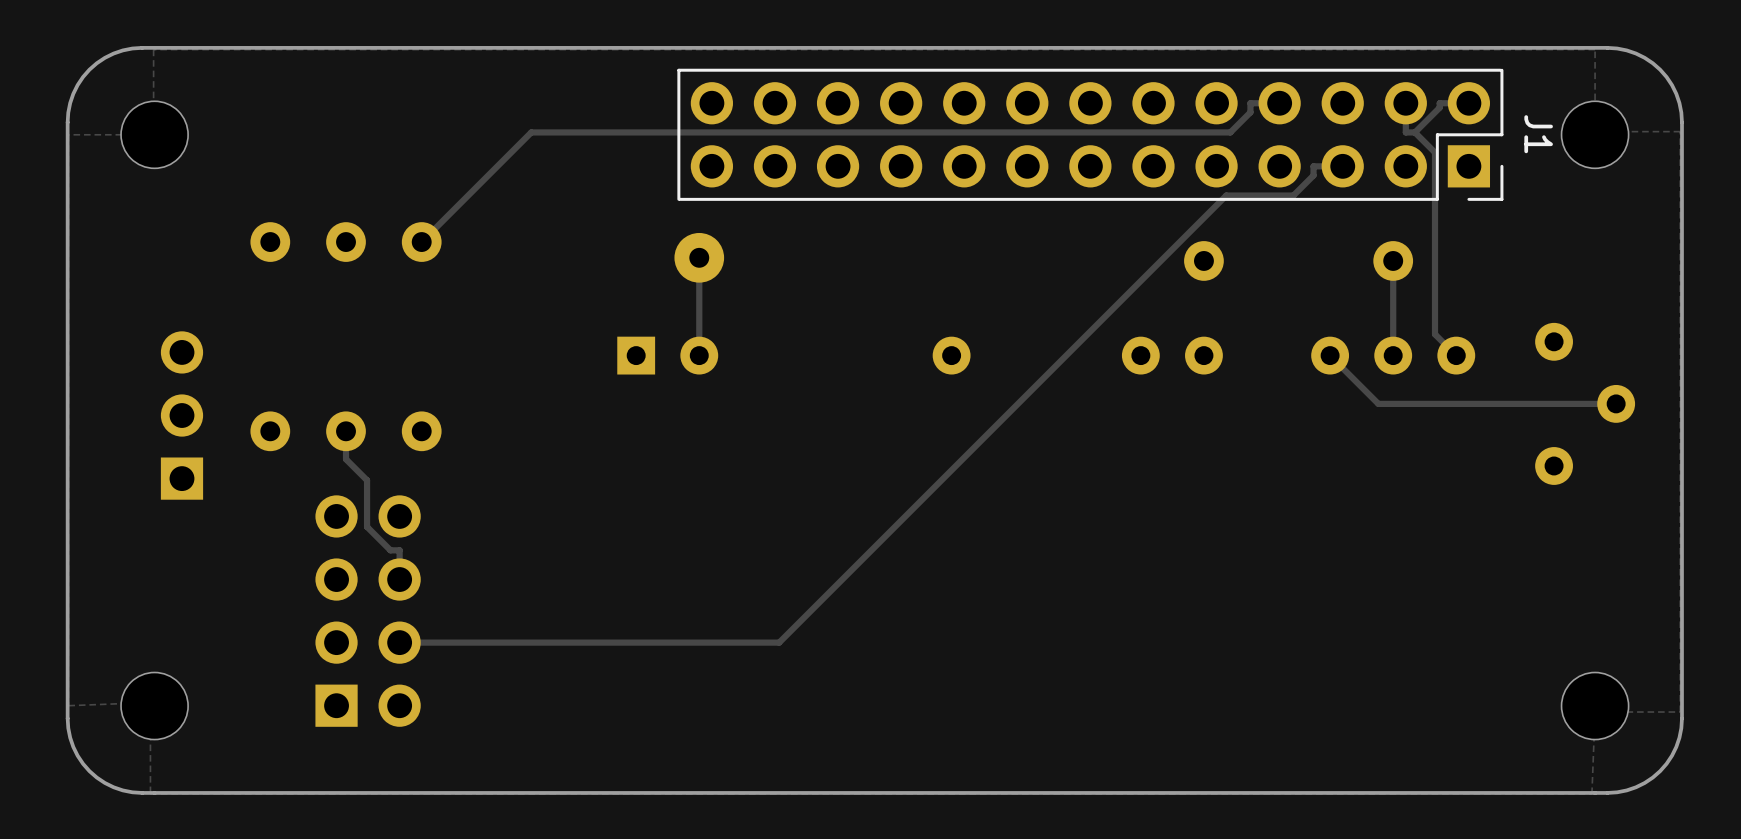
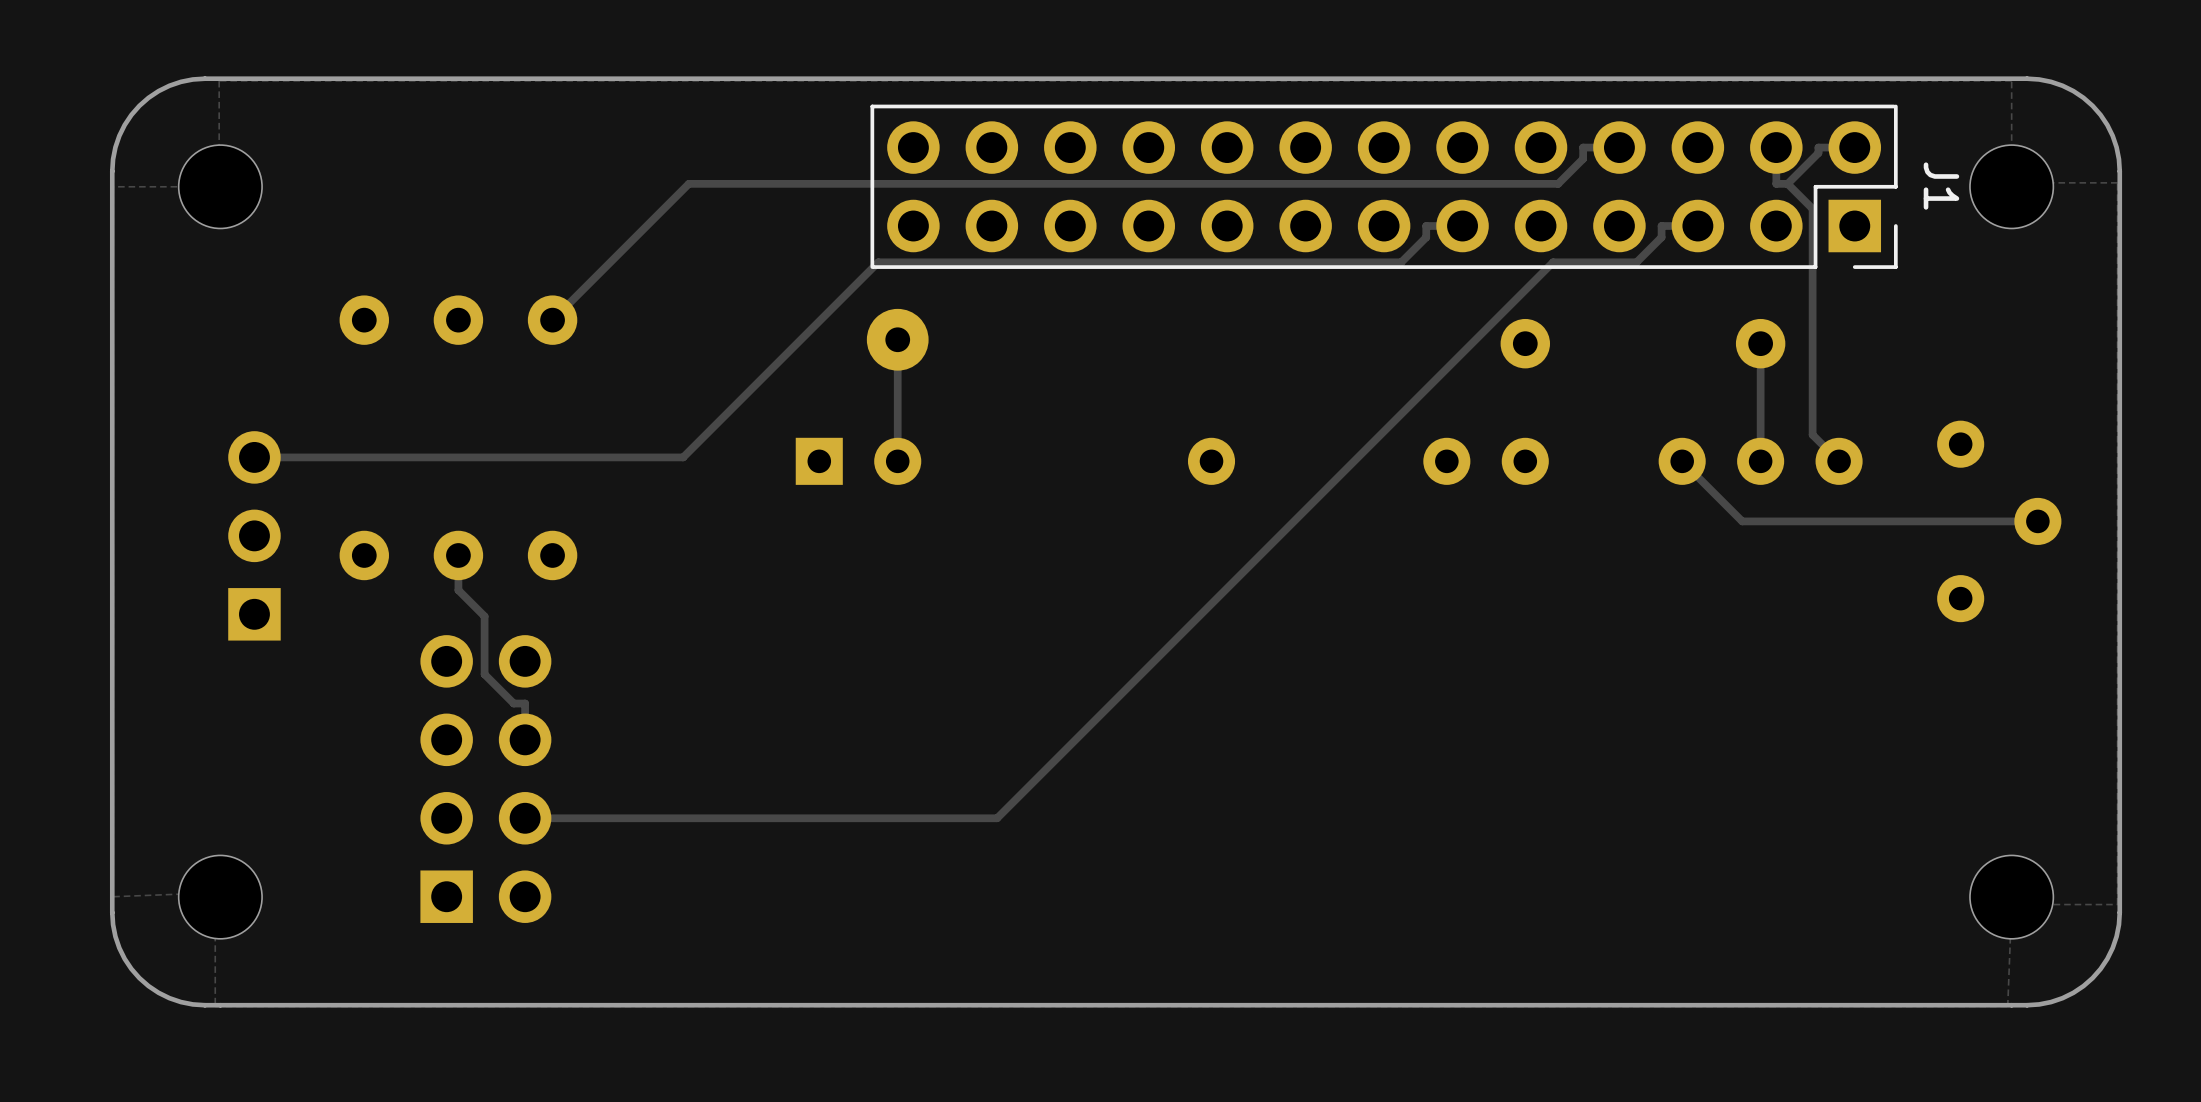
track: none -> (1462, 226) (1426, 226) (1426, 237) (1401, 262) (878, 262) (683, 457) (254, 457)

